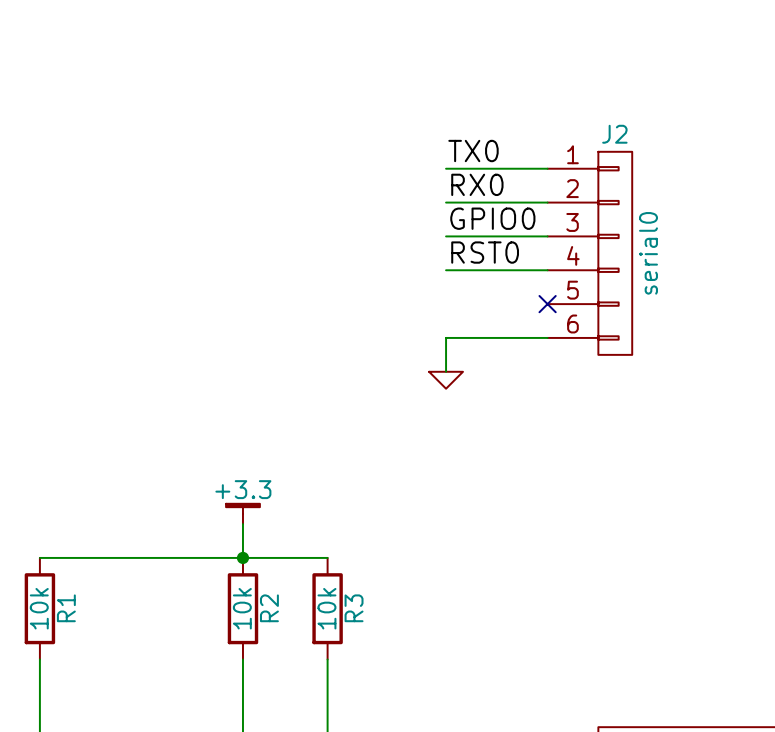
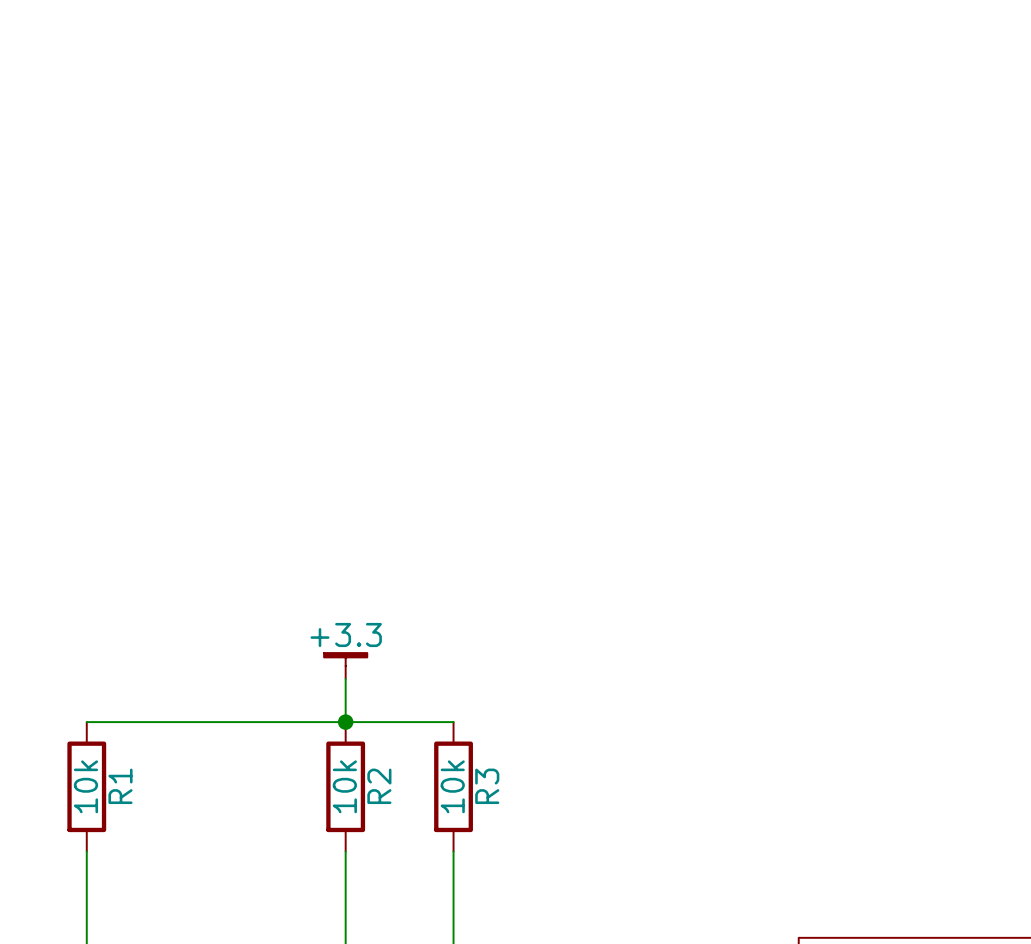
label: TX0 (473, 151) -> none
wire: (446, 168) (547, 168) -> none
label: RX0 (477, 184) -> none
wire: (446, 202) (547, 202) -> none
label: GPIO0 (492, 218) -> none
wire: (446, 236) (547, 236) -> none
label: RST0 (485, 252) -> none
J2: serial0 (589, 253) -> none
wire: (446, 270) (547, 270) -> none
no-connect mark: (547, 304) -> none
wire: (547, 337) (446, 337) (446, 371) -> none
power symbol: (446, 380) -> none

